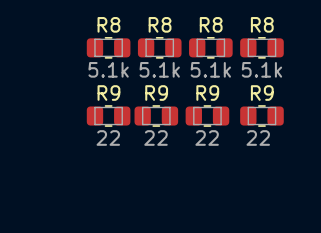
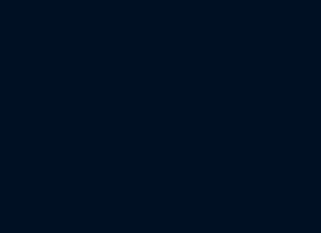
R8: 5.1k (108, 47) -> none
R8: 5.1k (159, 47) -> none
R8: 5.1k (210, 47) -> none
R8: 5.1k (261, 47) -> none
R9: 22 (108, 116) -> none
R9: 22 (156, 116) -> none
R9: 22 (207, 116) -> none
R9: 22 (261, 116) -> none

